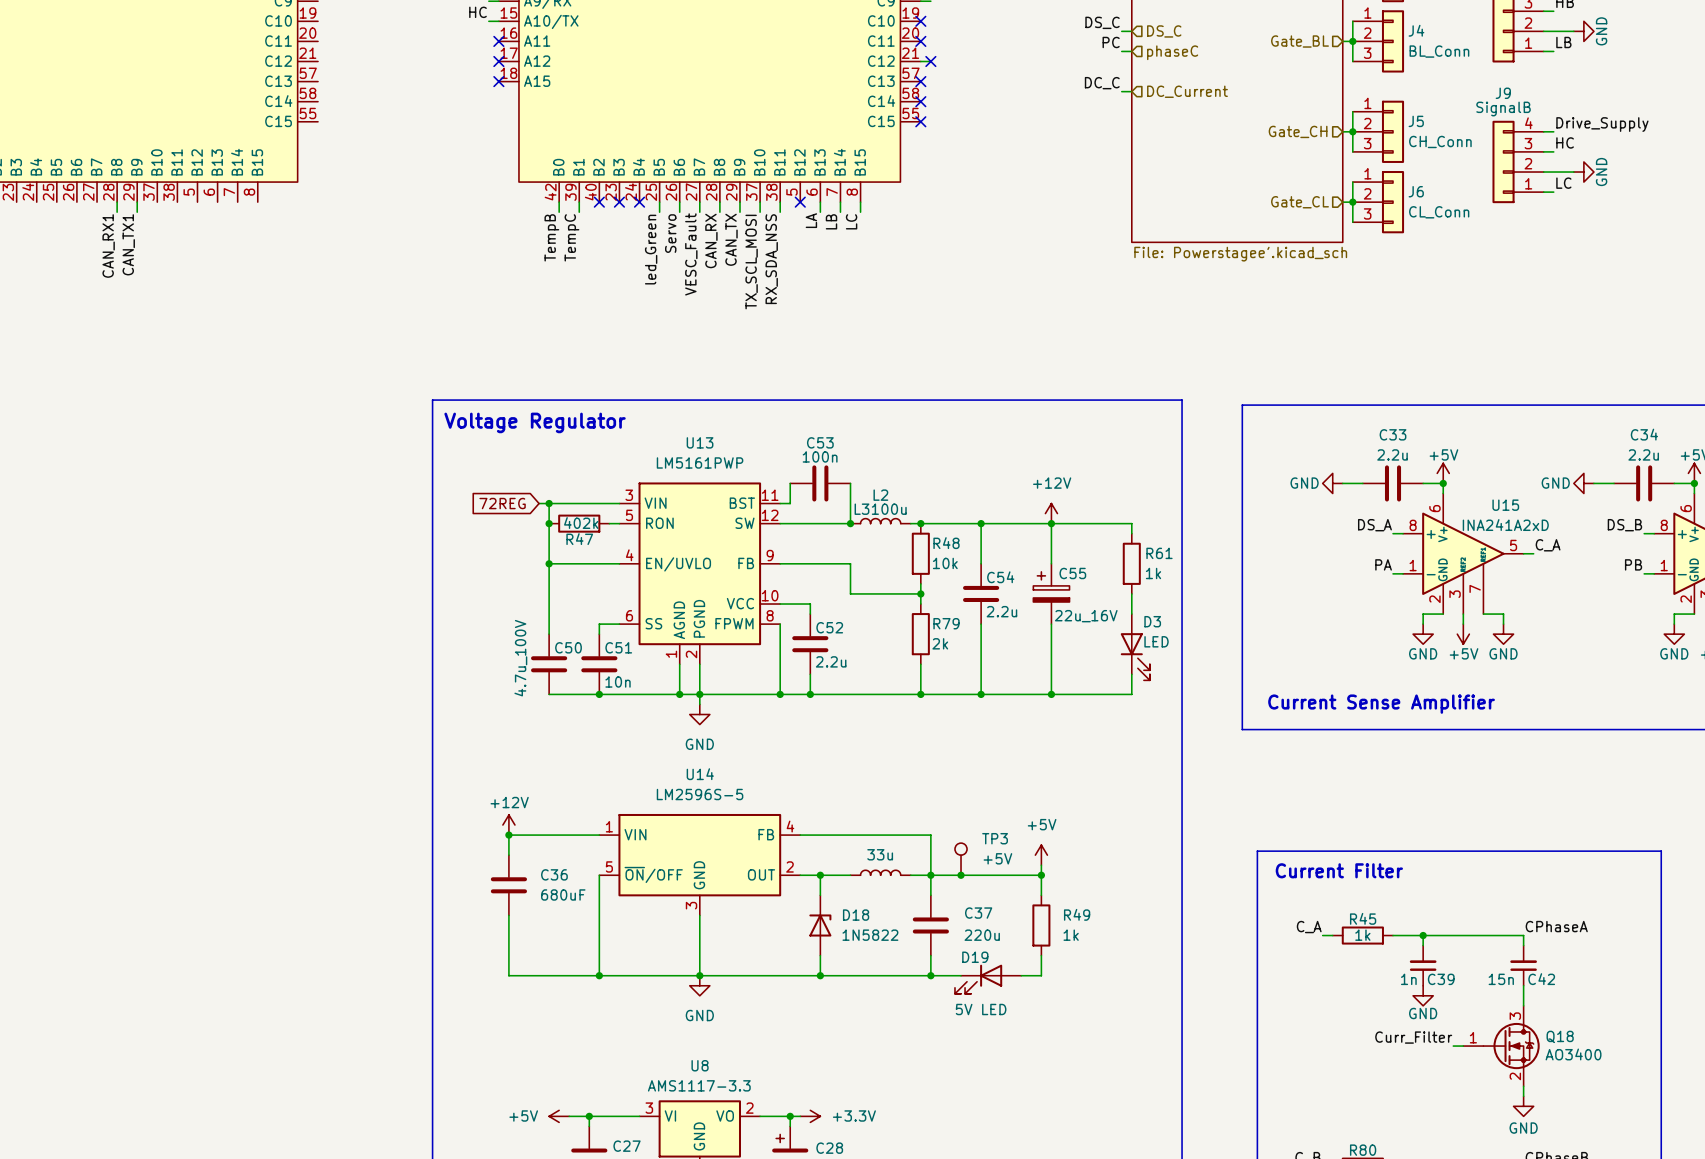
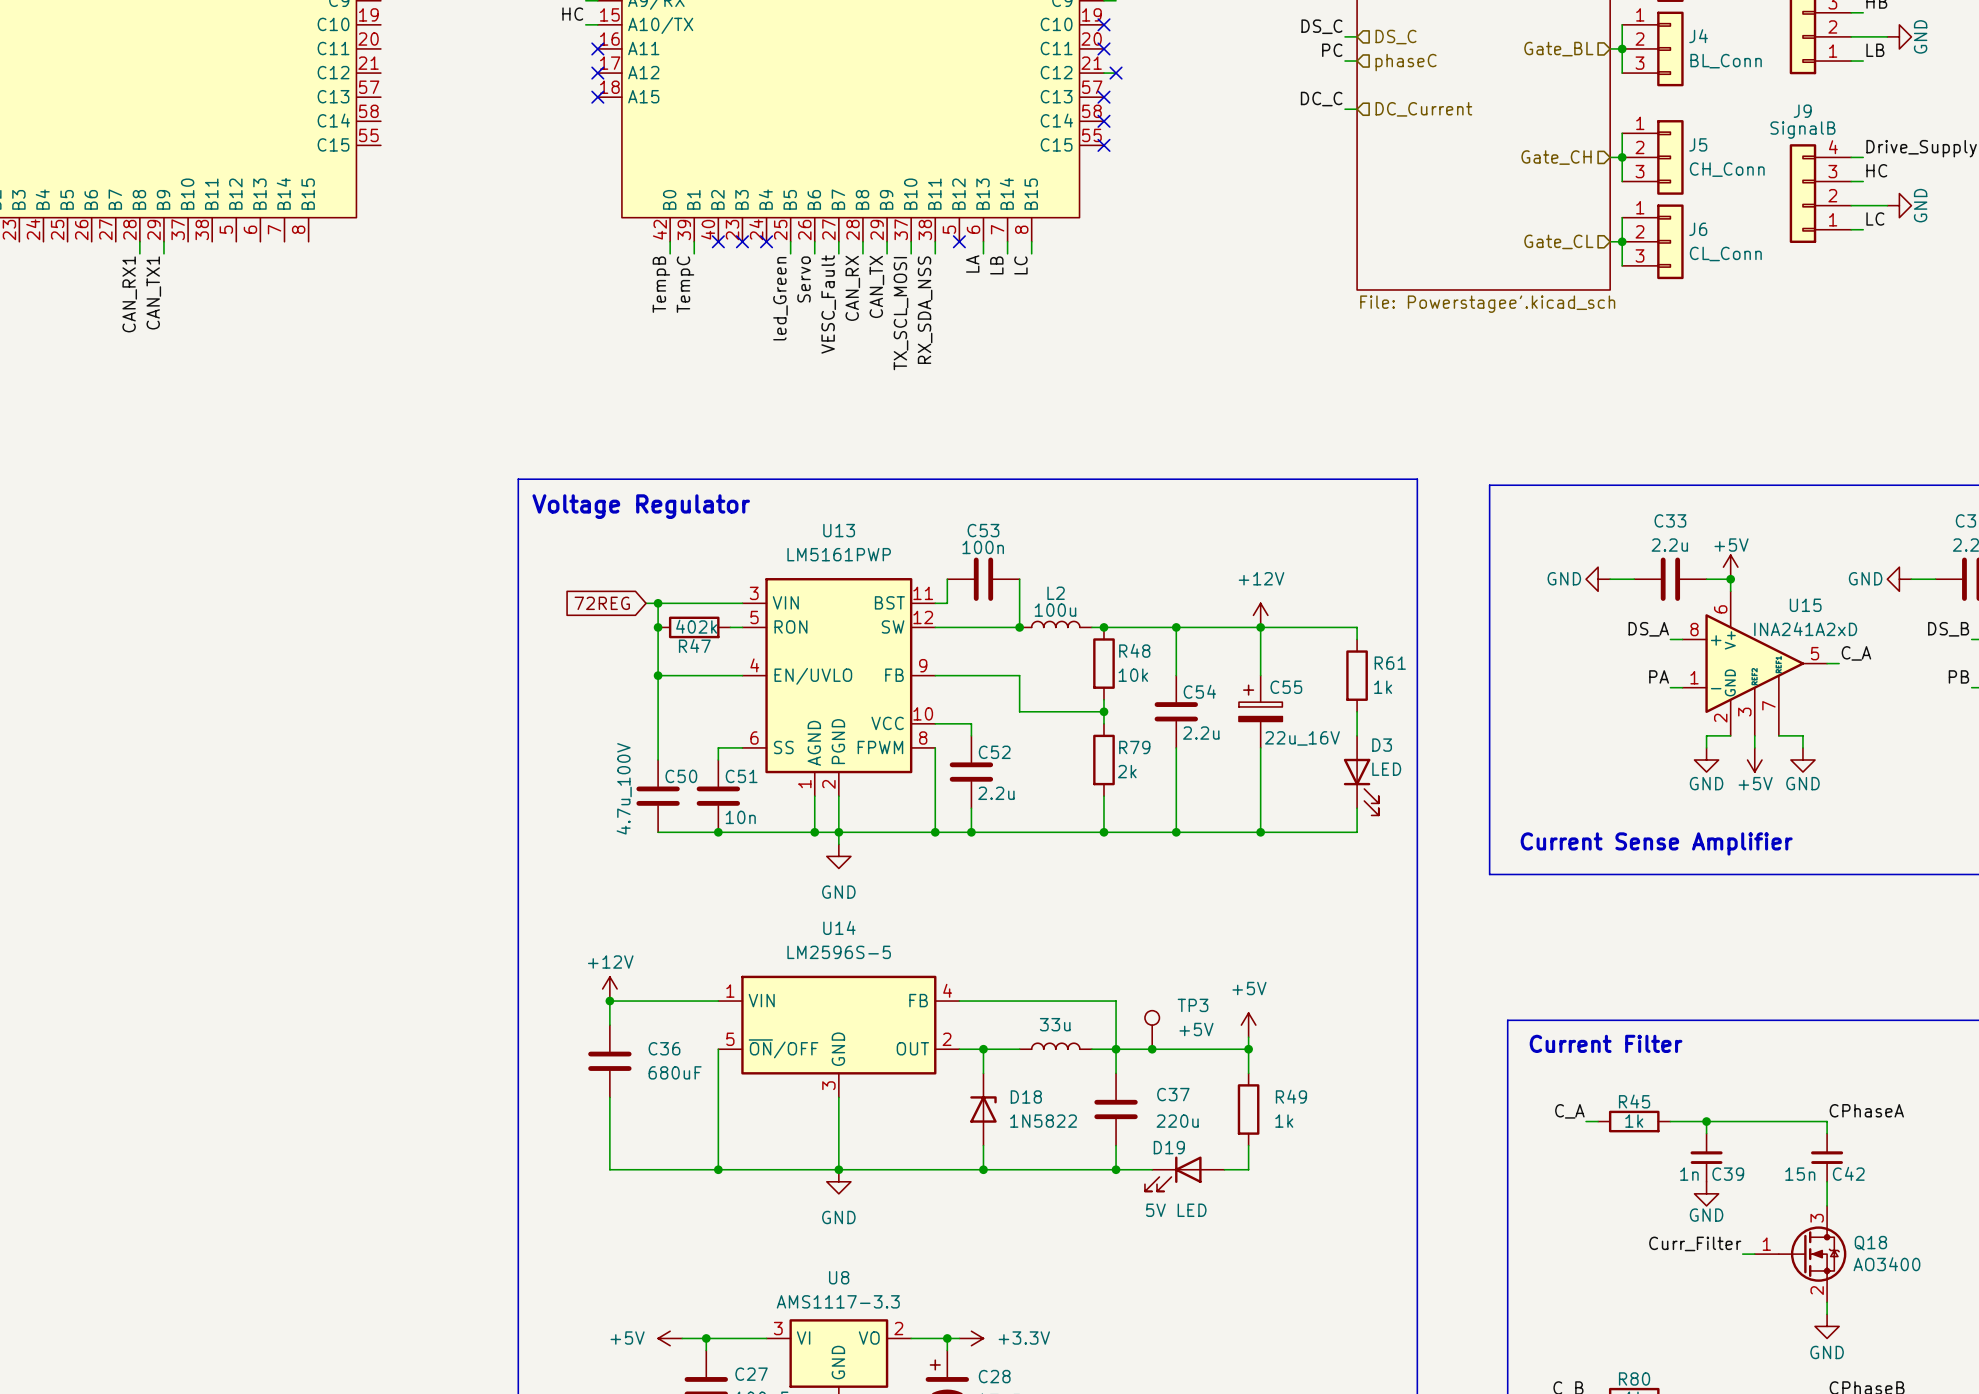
L2 value: L3100u (880, 509) -> 100u (1055, 610)

